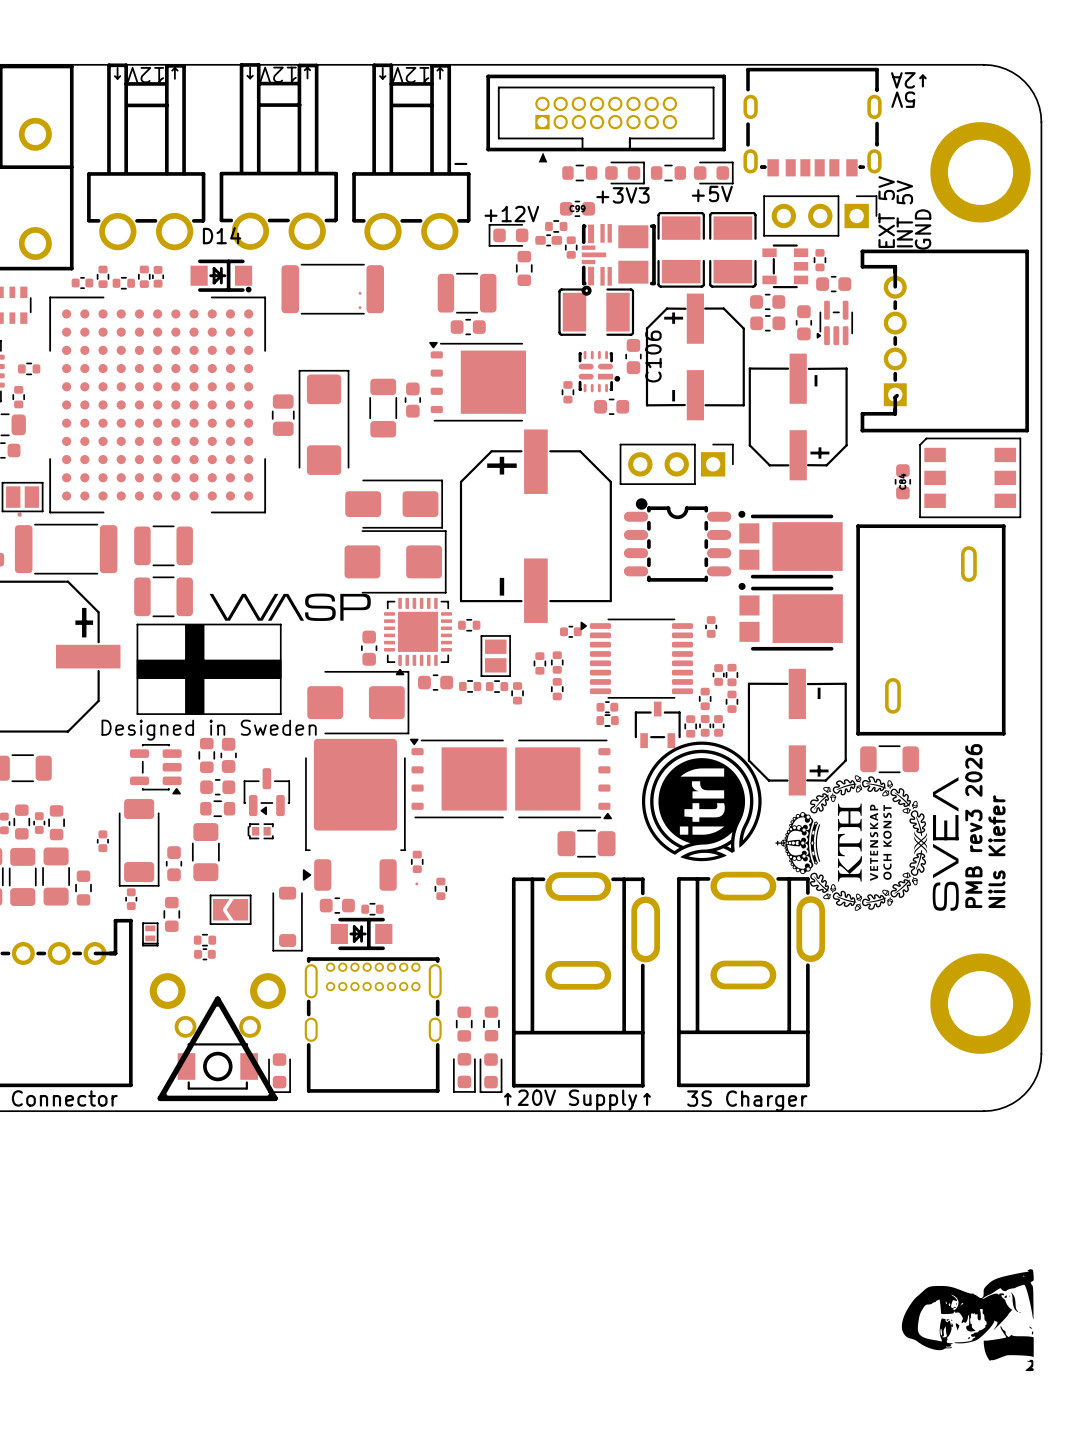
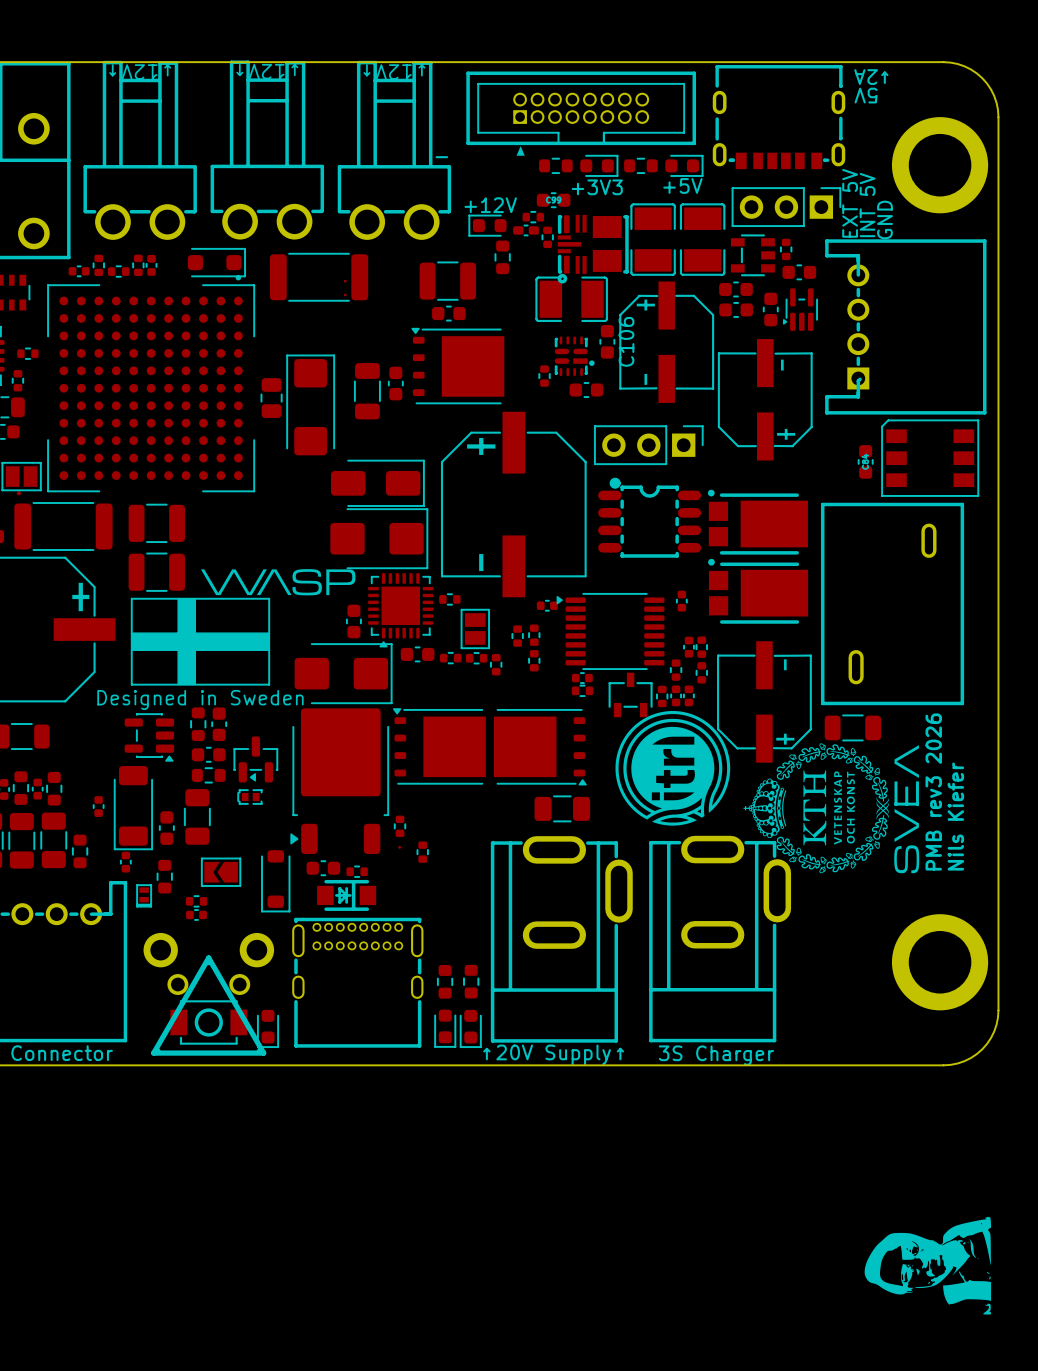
part: none -> (216, 262)
D14: (221, 275) -> none

